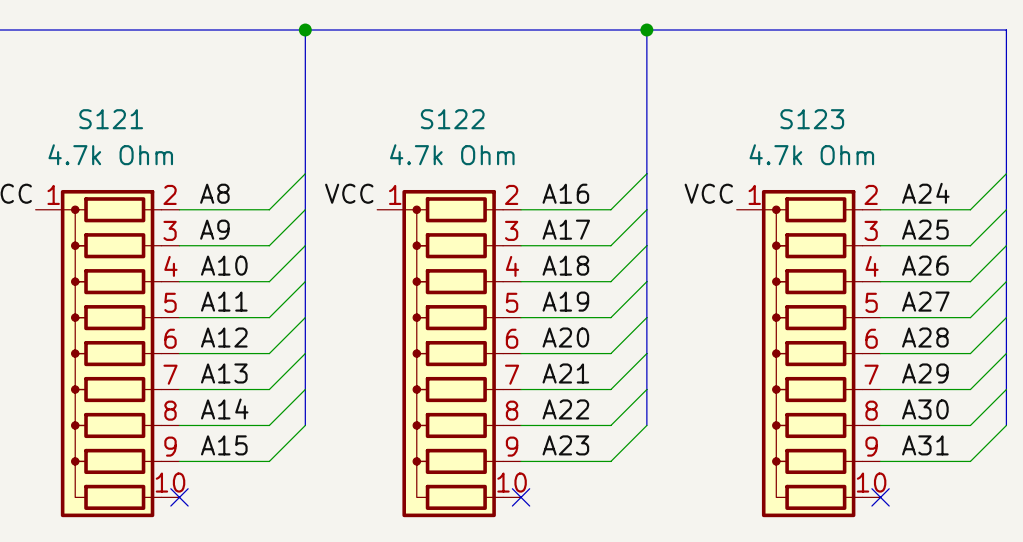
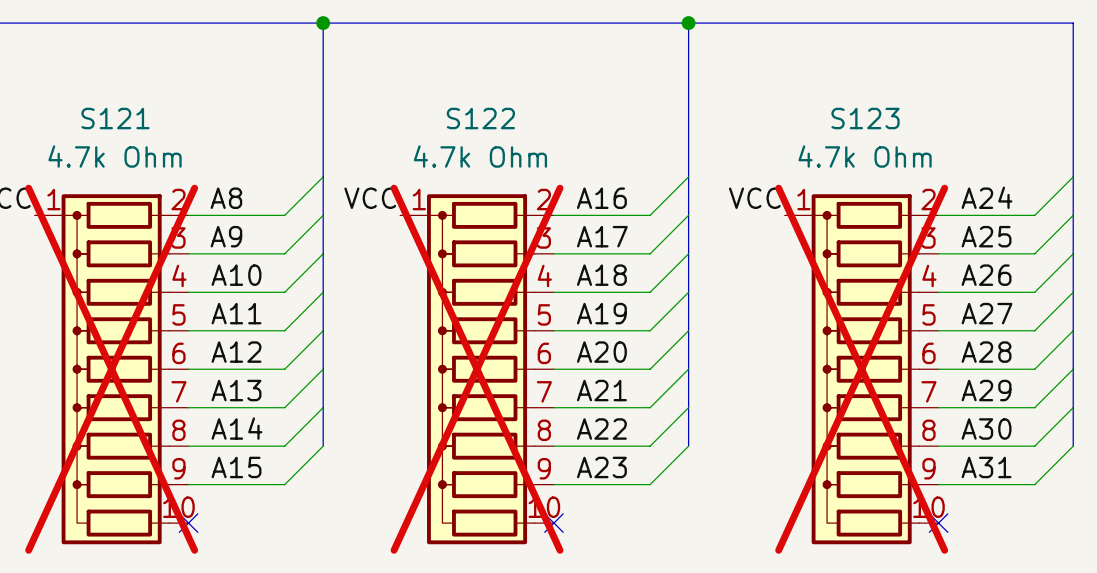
S121 do-not-place cross: none -> (111, 369)
S122 do-not-place cross: none -> (477, 369)
S123 do-not-place cross: none -> (861, 369)

